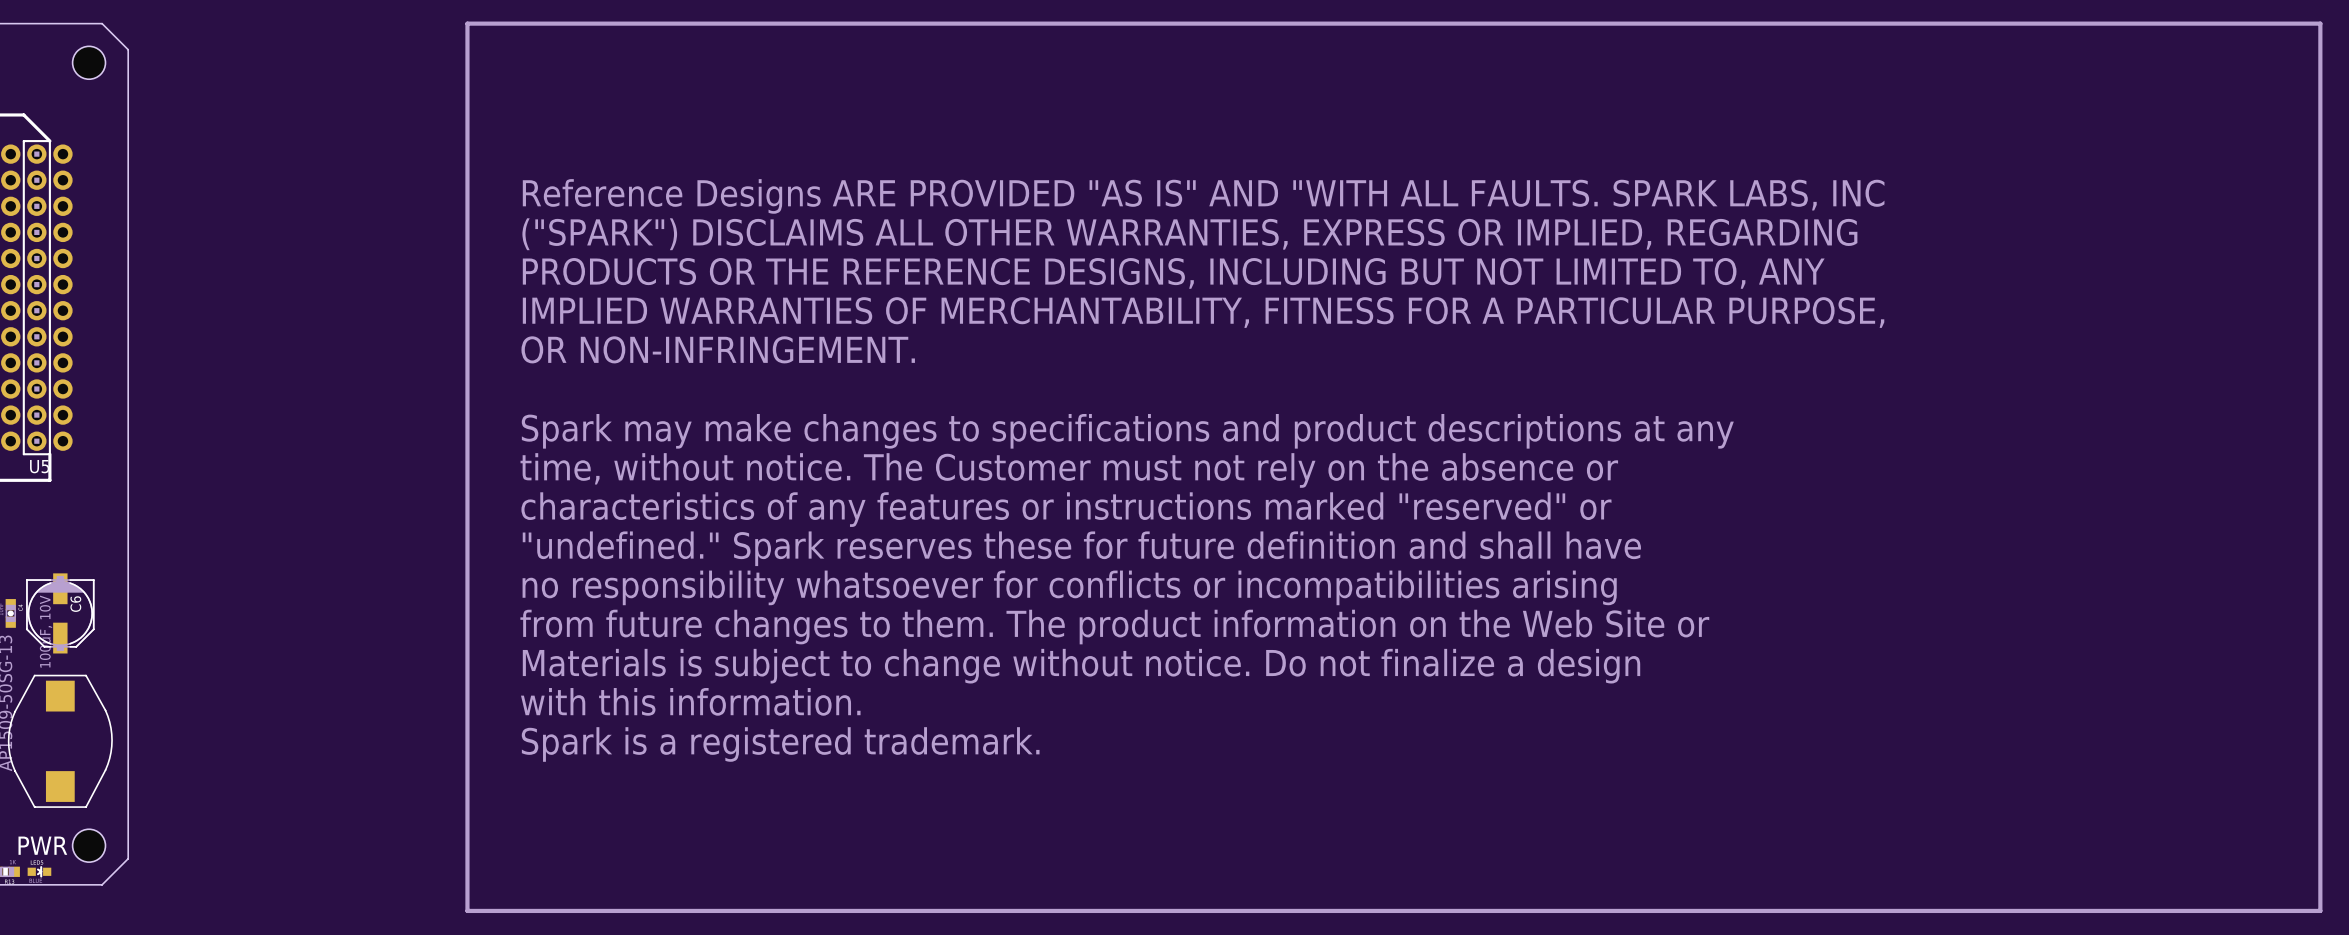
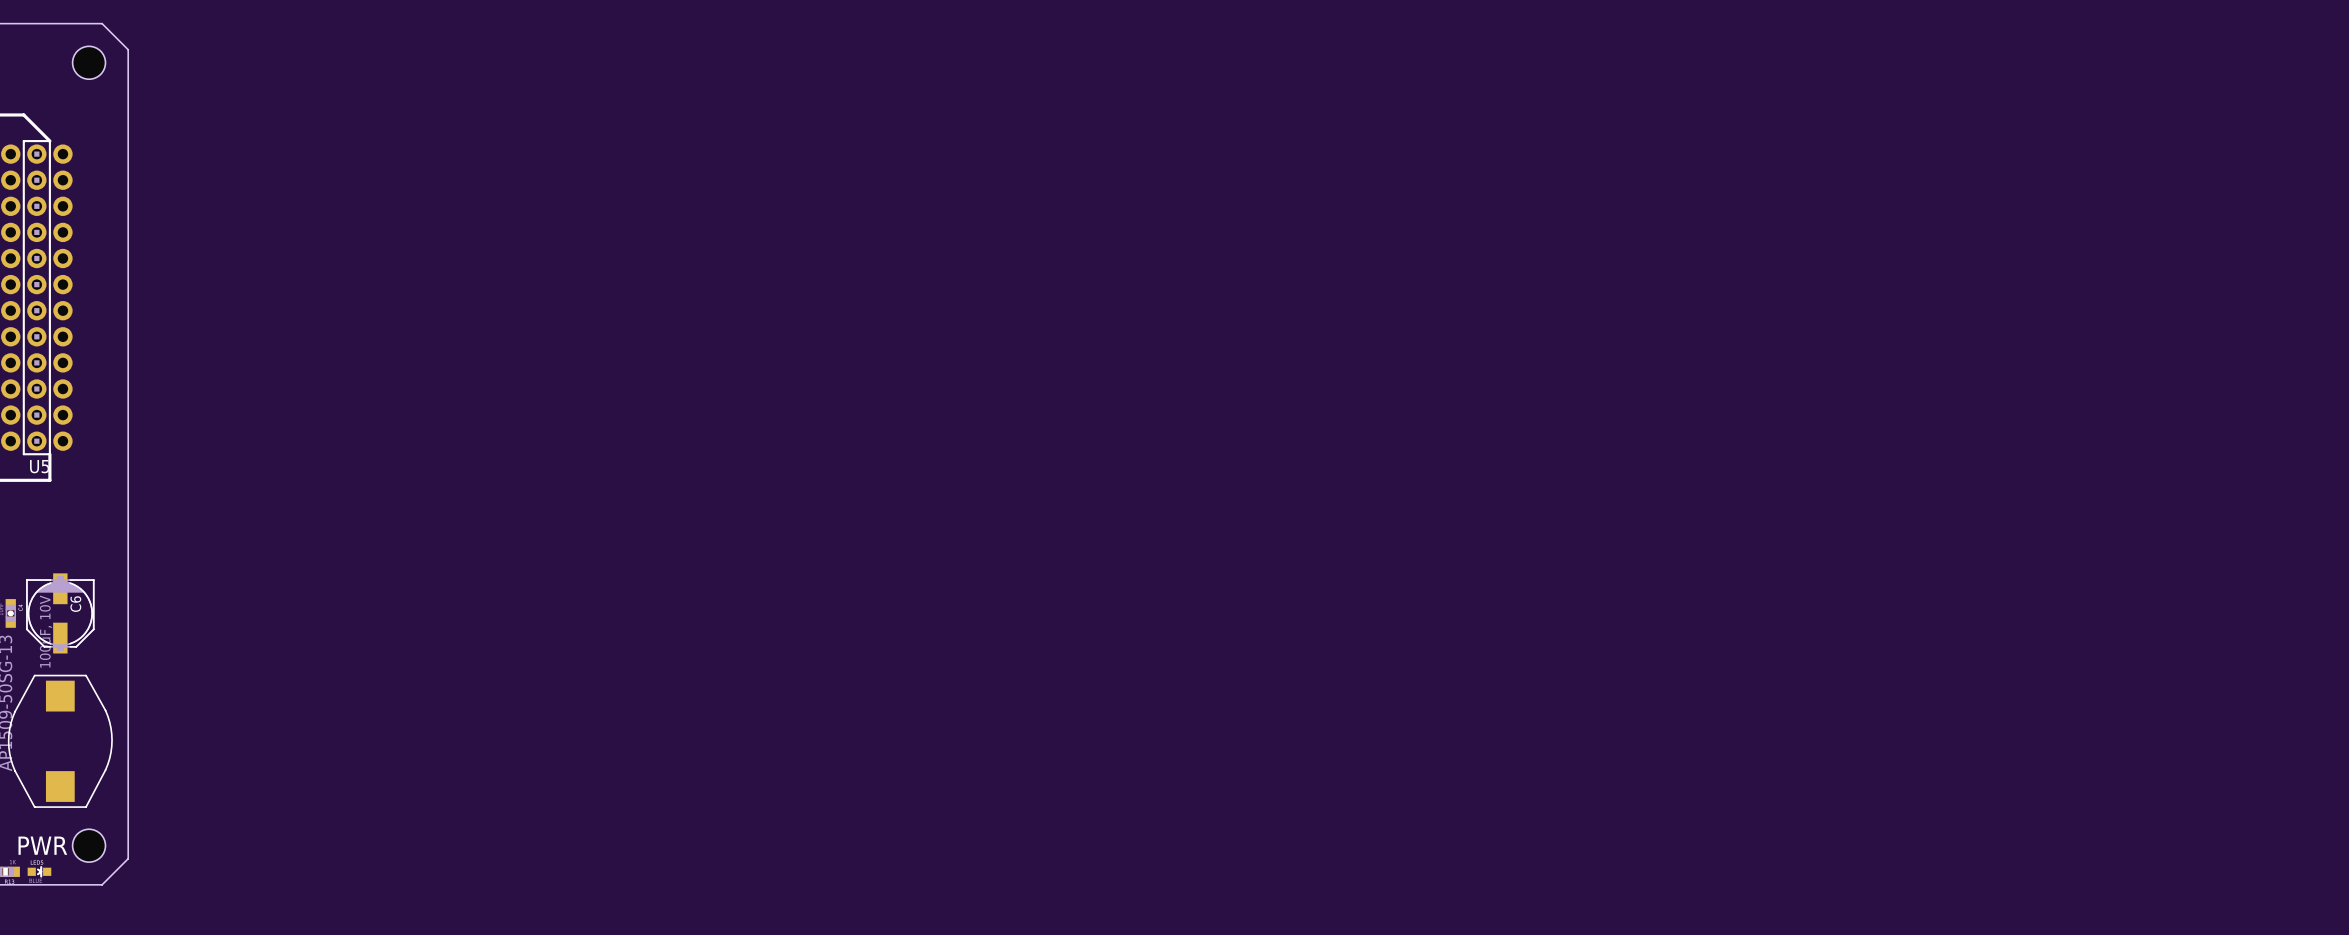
line: (467, 23) (467, 910) (2320, 910) (2320, 23) (467, 23) -> none
text: Reference Designs ARE PROVIDED "AS IS" AND "WITH ALL FAULTS. SPARK LABS, INC (1203, 196) -> none
text: ("SPARK") DISCLAIMS ALL OTHER WARRANTIES, EXPRESS OR IMPLIED, REGARDING (1189, 234) -> none
text: PRODUCTS OR THE REFERENCE DESIGNS, INCLUDING BUT NOT LIMITED TO, ANY (1173, 273) -> none
text: IMPLIED WARRANTIES OF MERCHANTABILITY, FITNESS FOR A PARTICULAR PURPOSE, (1203, 312) -> none
text: OR NON-INFRINGEMENT. (718, 349) -> none
text: Spark may make changes to specifications and product descriptions at any (1127, 431) -> none
text: time, without notice. The Customer must not rely on the absence or (1069, 470) -> none
text: characteristics of any features or instructions marked "reserved" or (1066, 509) -> none
text: "undefined." Spark reserves these for future definition and shall have (1081, 548) -> none
text: no responsibility whatsoever for conflicts or incompatibilities arising (1069, 587) -> none
text: from future changes to them. The product information on the Web Site or (1114, 627) -> none
text: Materials is subject to change without notice. Do not finalize a design (1081, 666) -> none
text: with this information. (690, 701) -> none
text: Spark is a registered trademark. (780, 744) -> none

